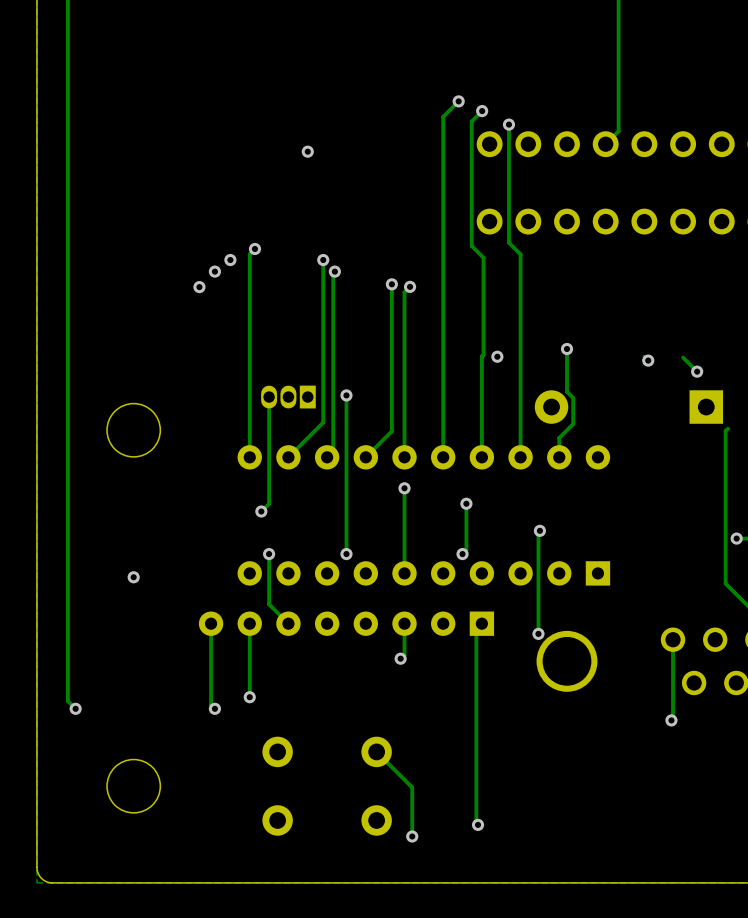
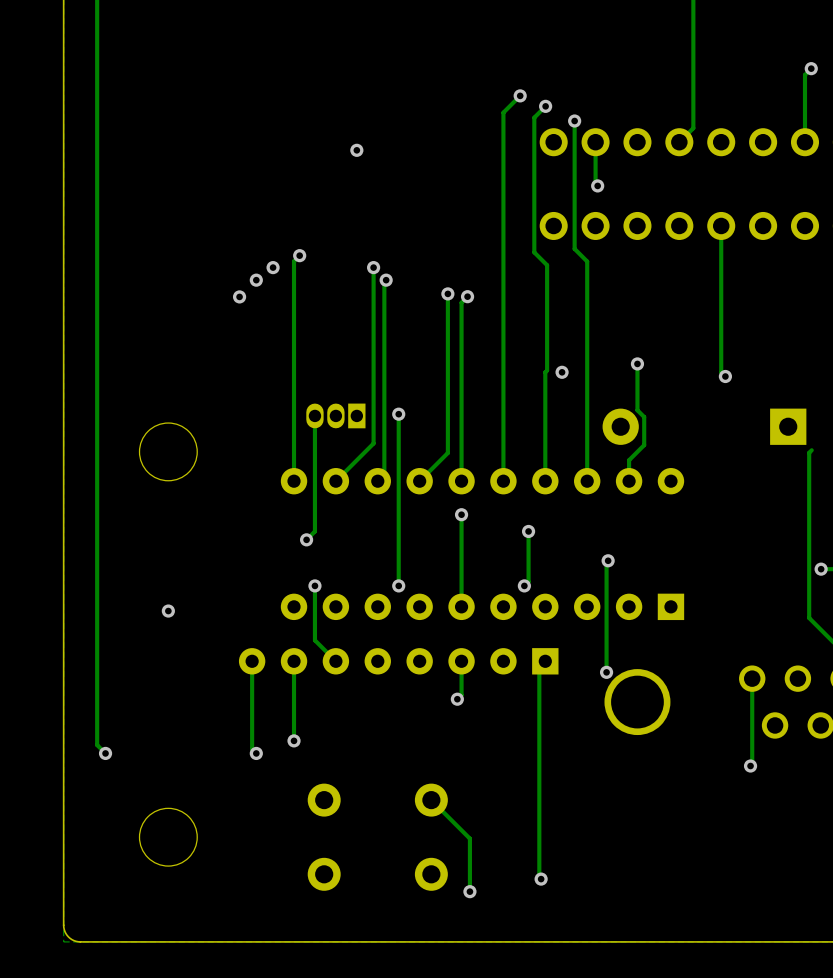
track: none -> (811, 68) (804, 74) (804, 142)
via: none -> (811, 68)
track: none -> (595, 142) (595, 183) (597, 185)
via: none -> (597, 185)
track: none -> (721, 225) (721, 372)
track: (683, 357) (697, 371) -> none
via: (697, 371) -> none

